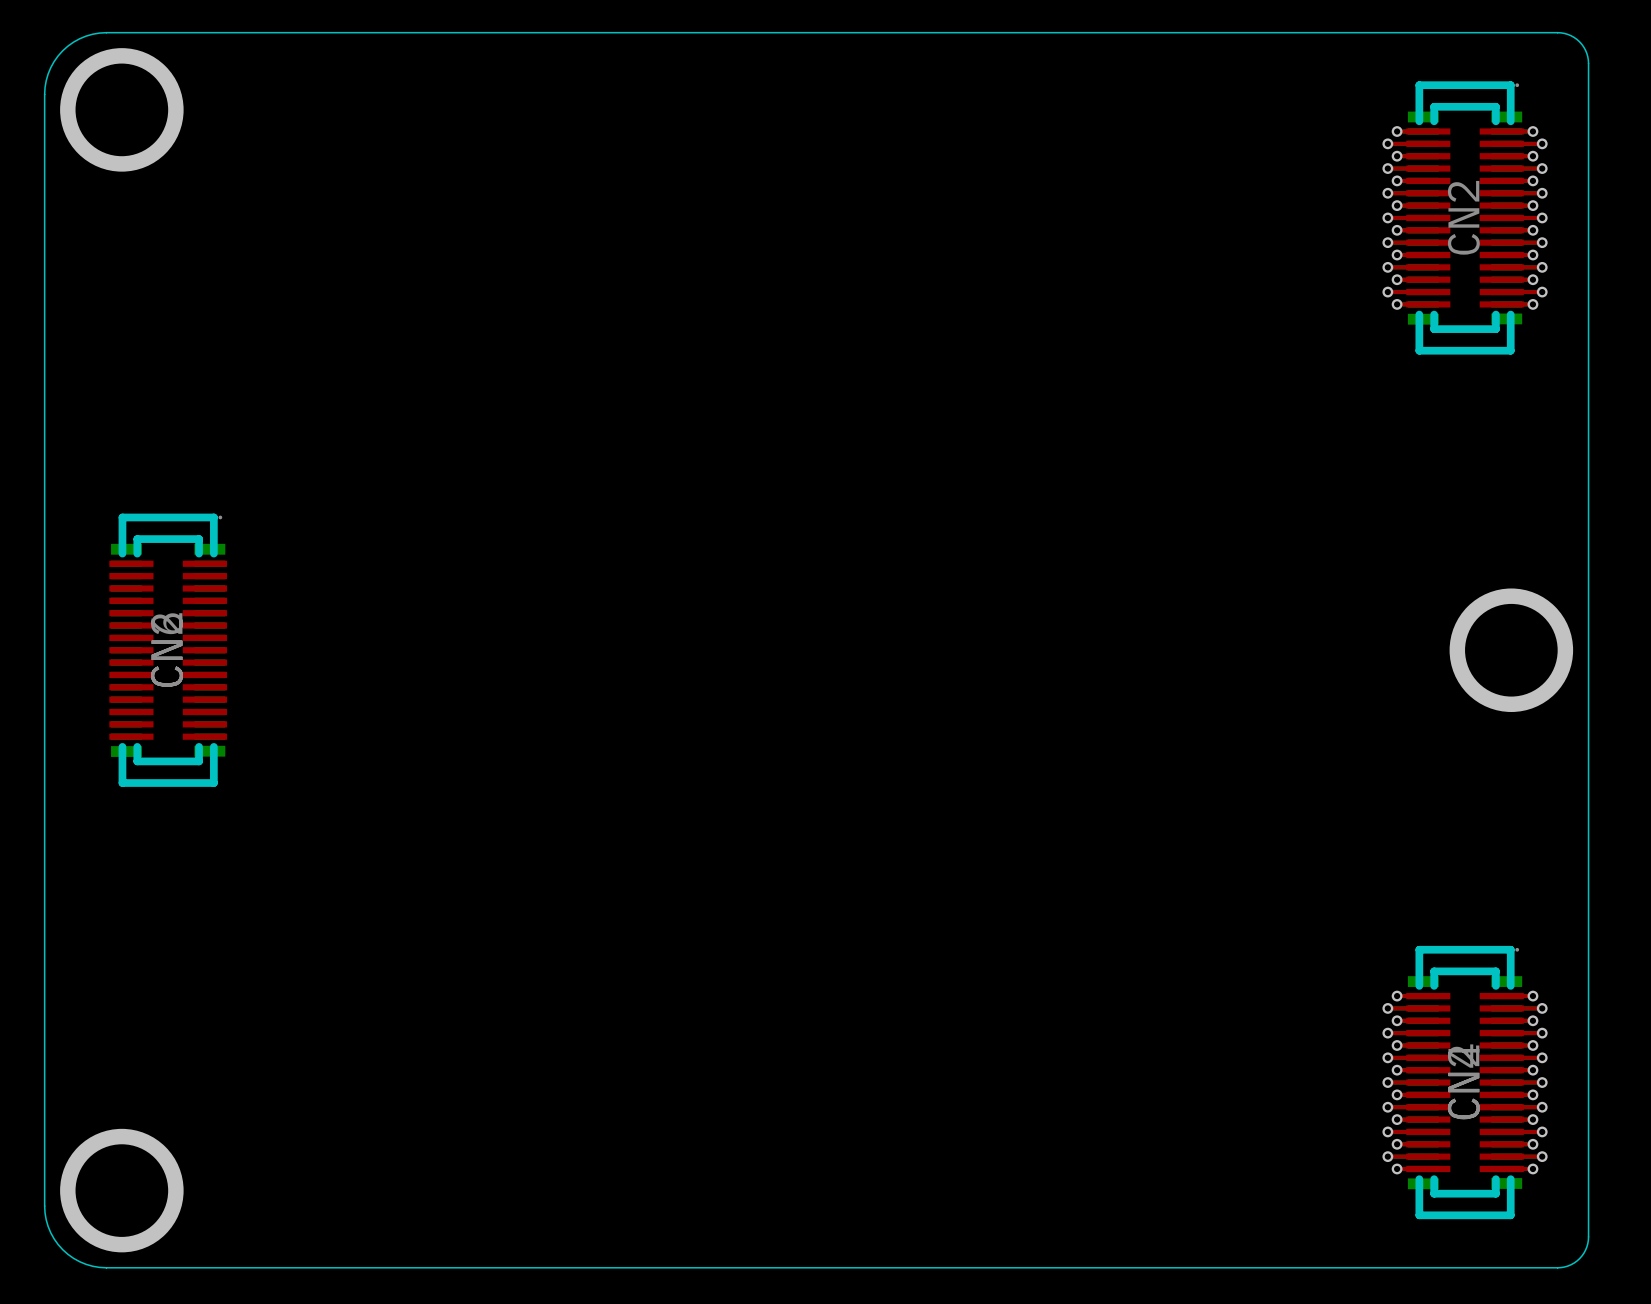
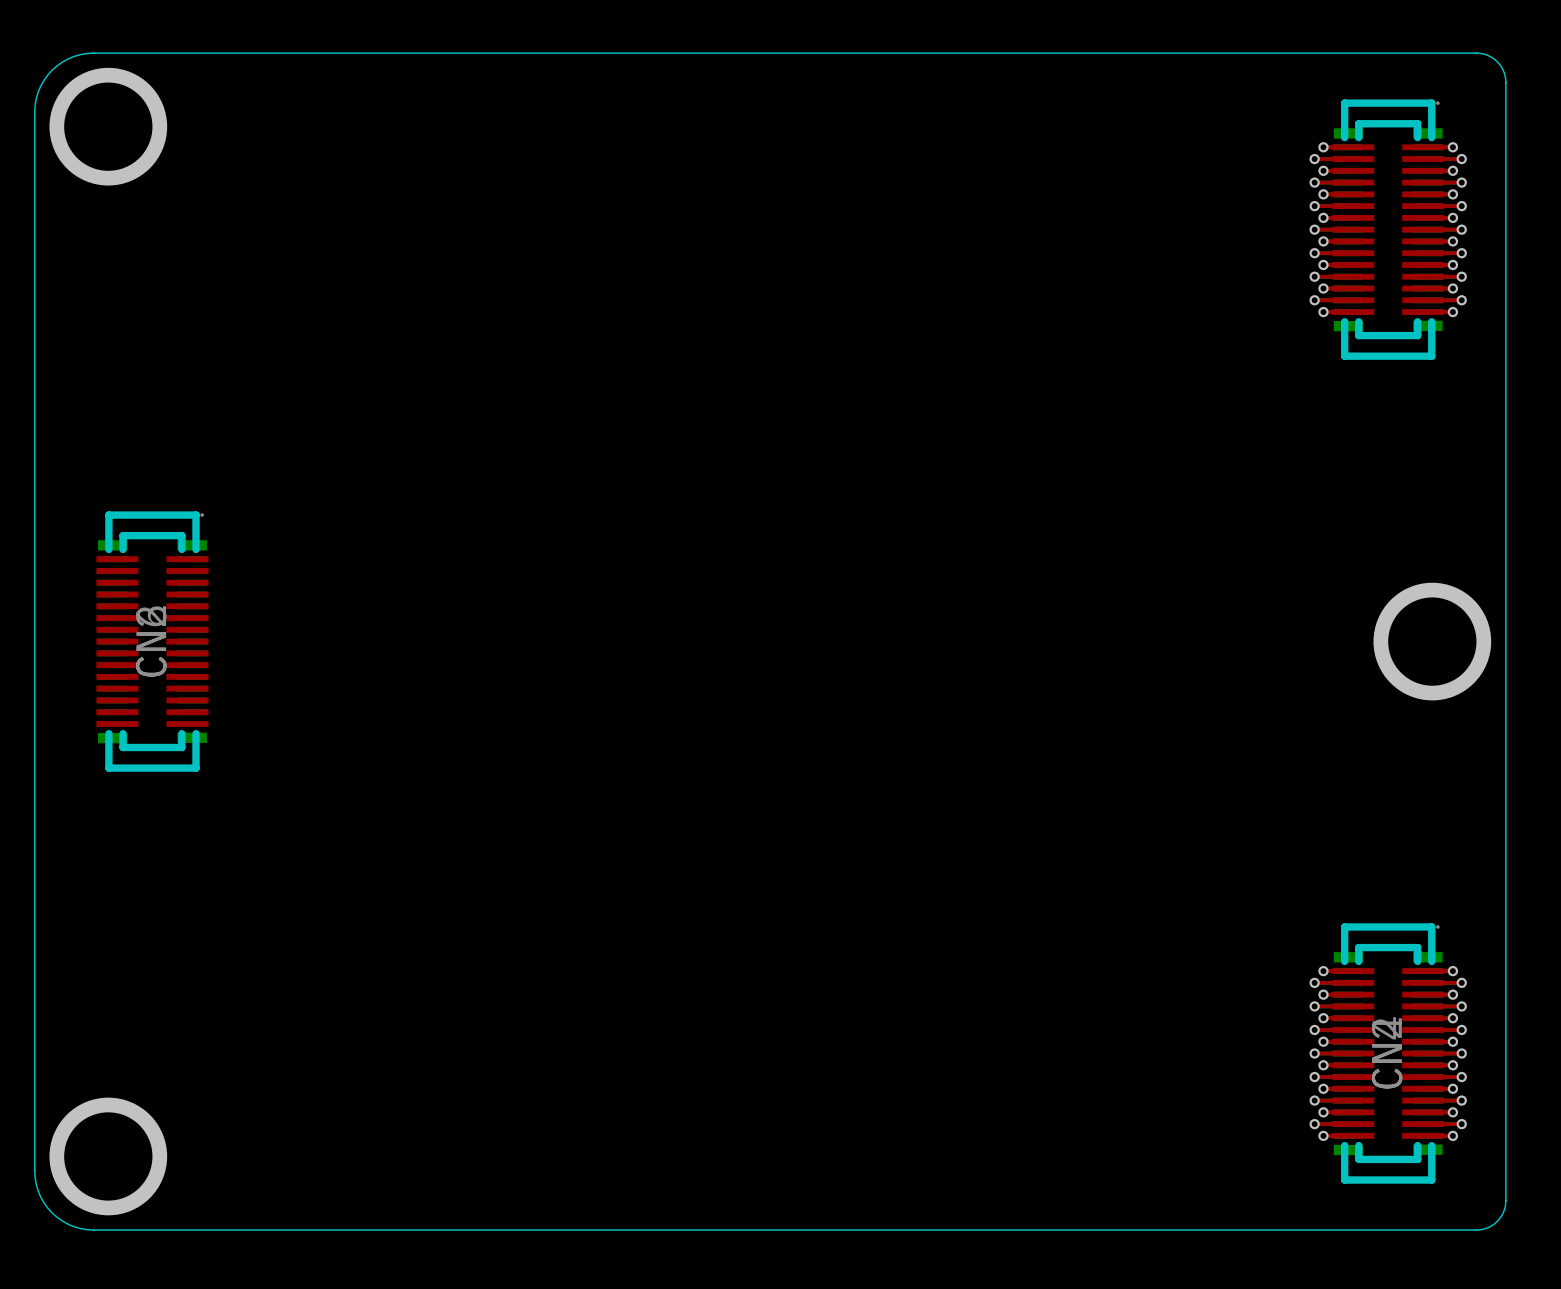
CN2 name: CN2 (1463, 217) -> none

